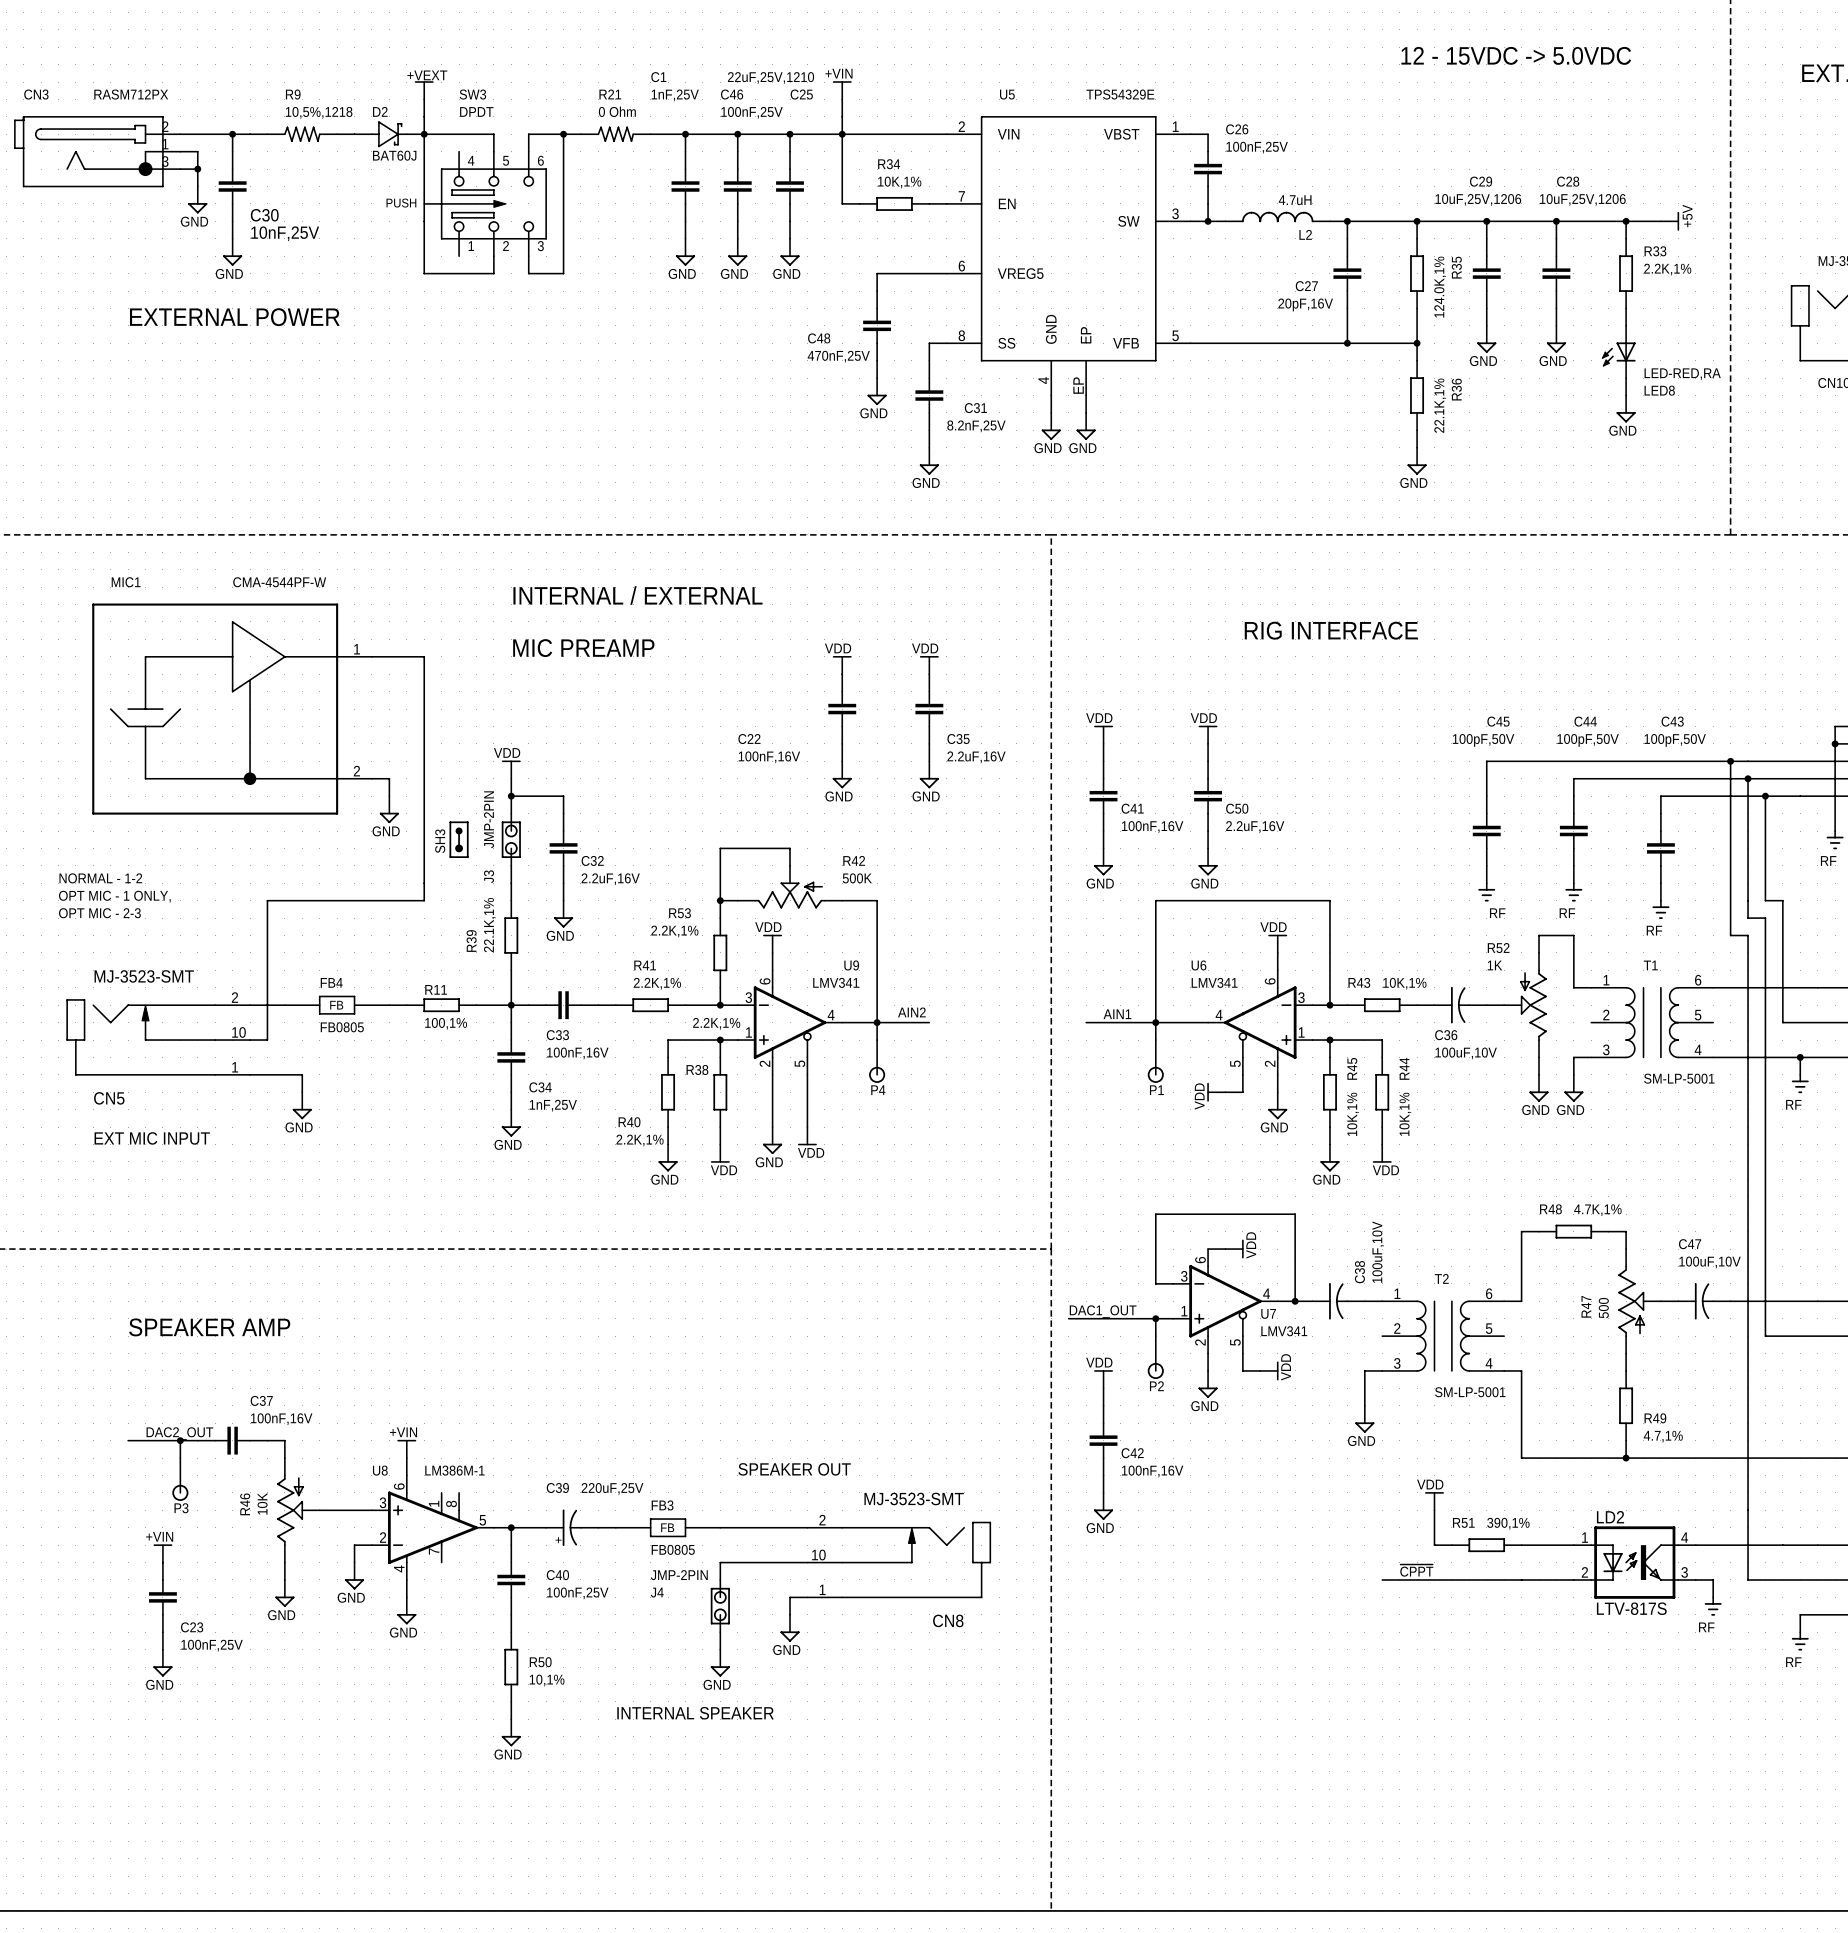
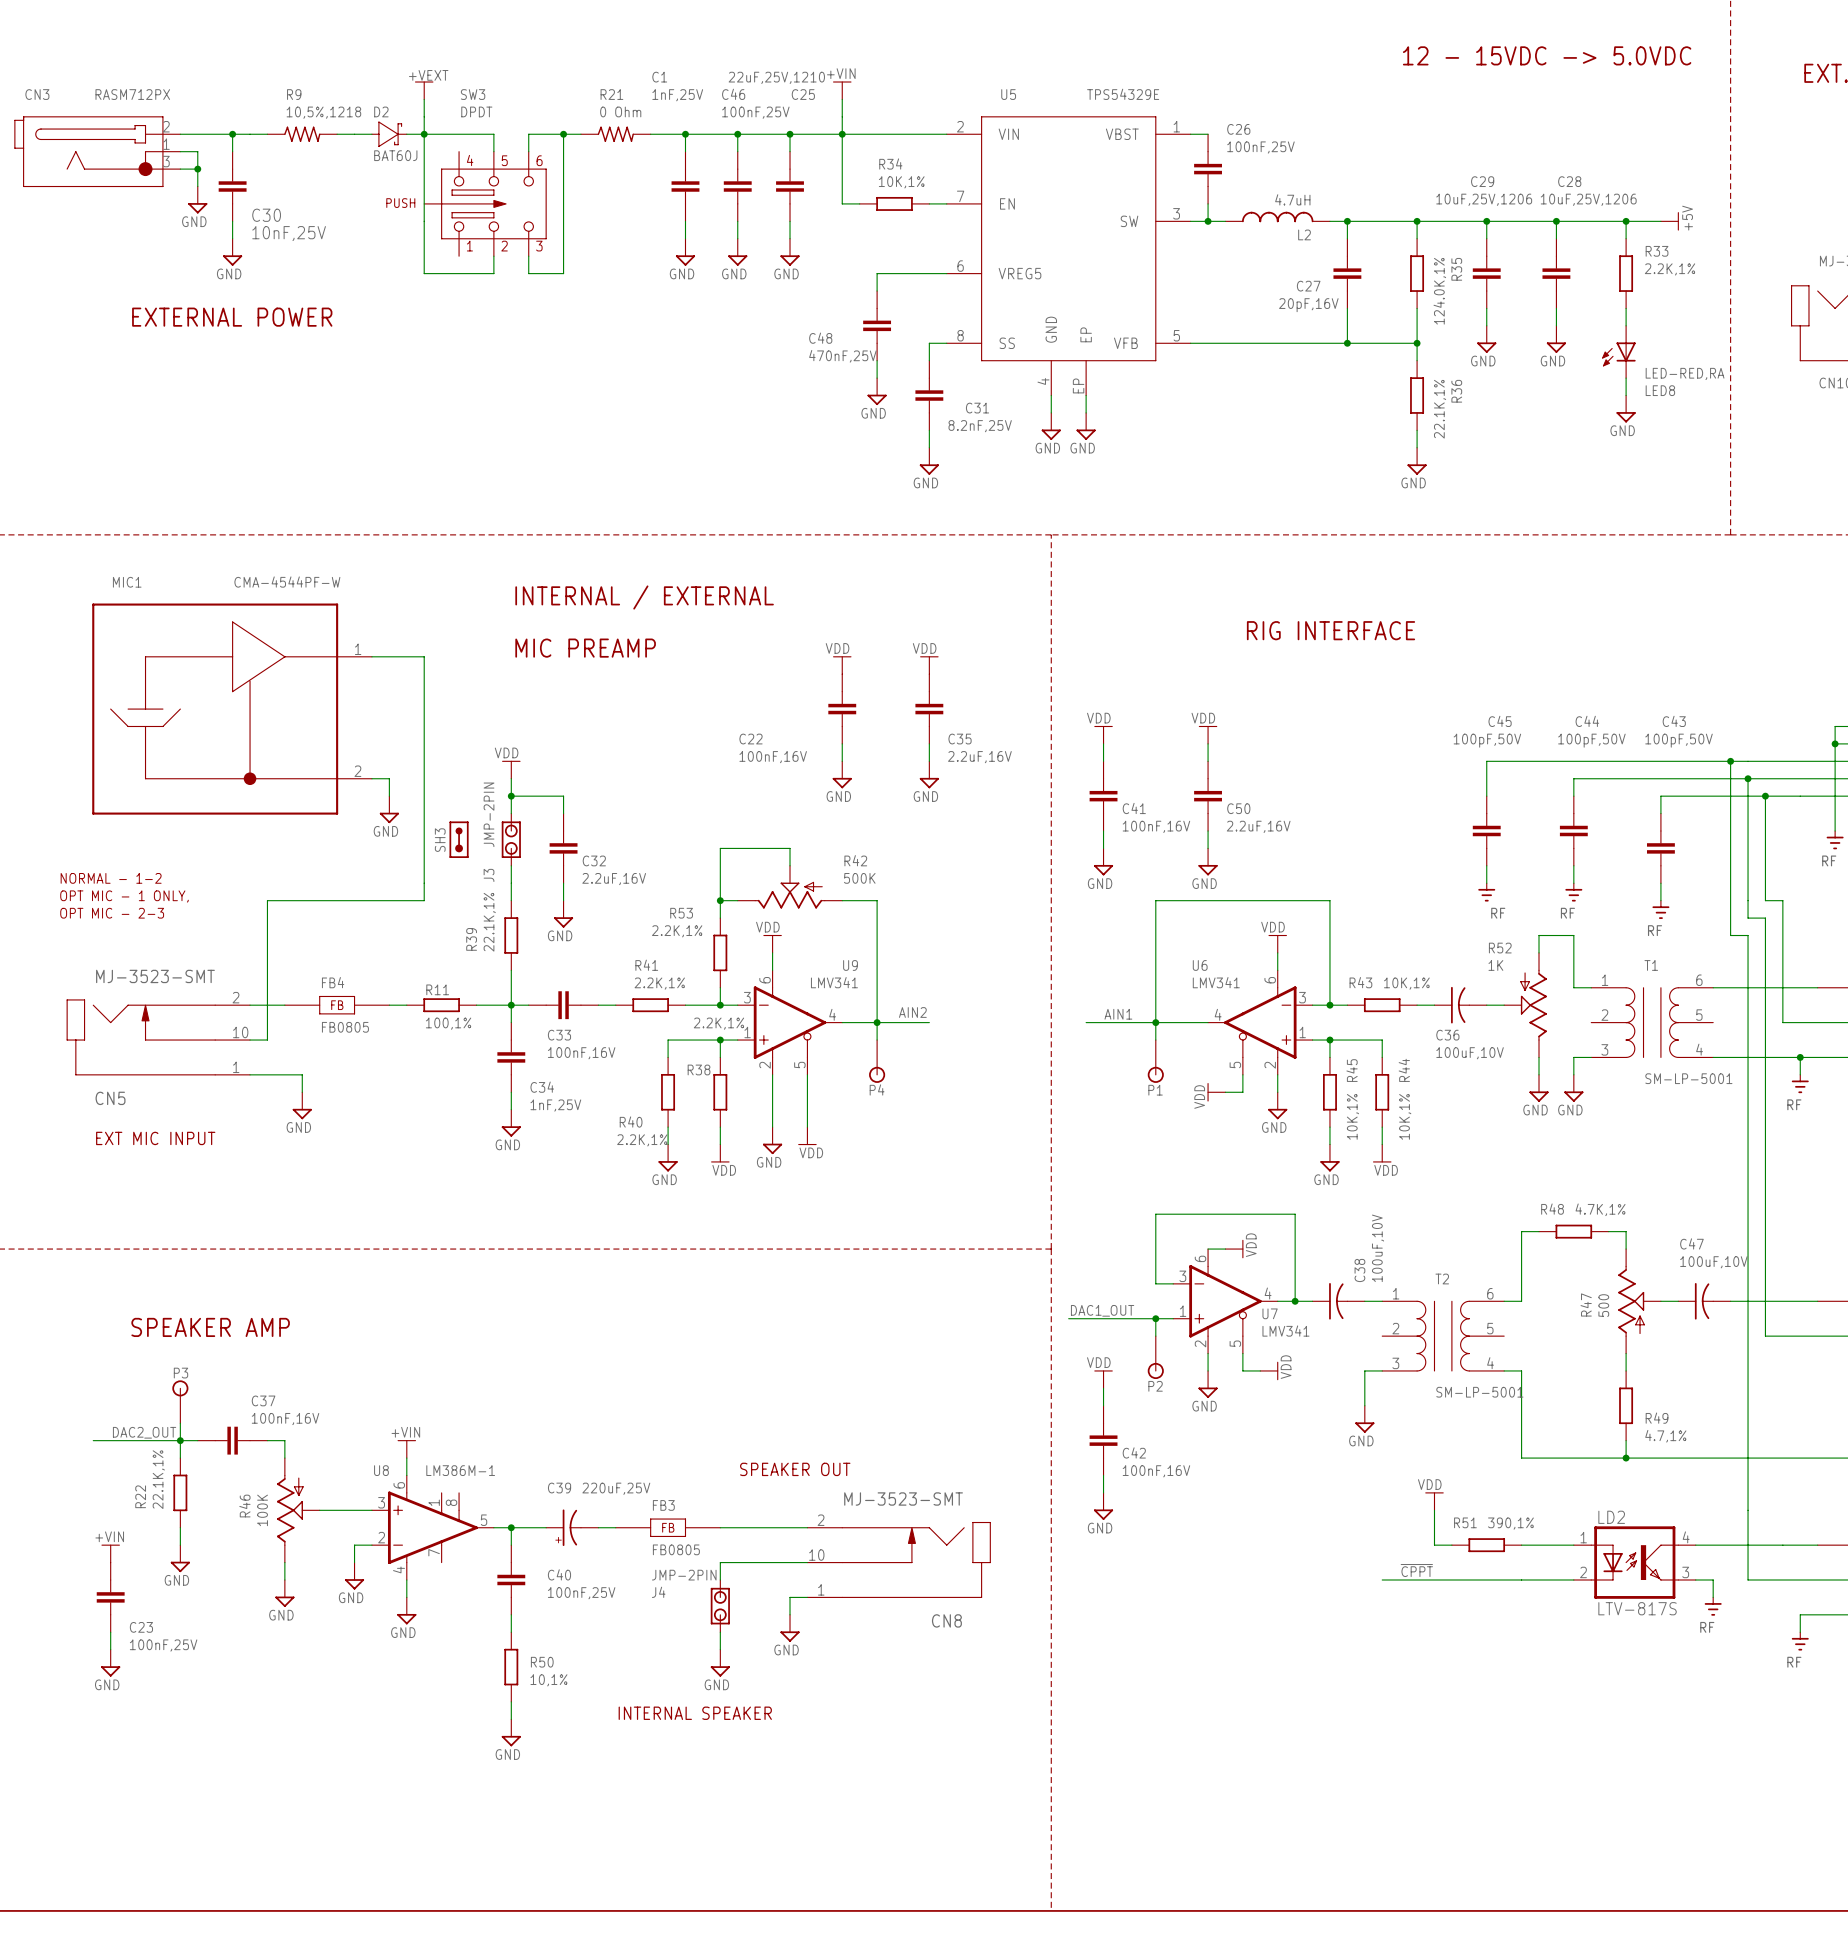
wire: none -> (180, 1423) (180, 1440)
label position: DAC2_OUT (179, 1433) -> DAC2_OUT (144, 1432)
wire: none -> (93, 1440) (128, 1440)
P3 position: (180, 1479) -> (180, 1401)
P3 rotation: 0° (180, 1492) -> 180° (180, 1388)
R22: none -> 22.1K,1% (180, 1492)
R46 value: 10K (262, 1503) -> 100K (262, 1510)
wire: none -> (180, 1527) (180, 1545)
power symbol position: +VIN (162, 1553) -> +VIN (110, 1553)
power symbol: none -> GND (180, 1558)
C23 position: (162, 1597) -> (110, 1597)
wire: (162, 1632) (162, 1649) -> (110, 1632) (110, 1649)
power symbol position: GND (162, 1663) -> GND (110, 1663)

